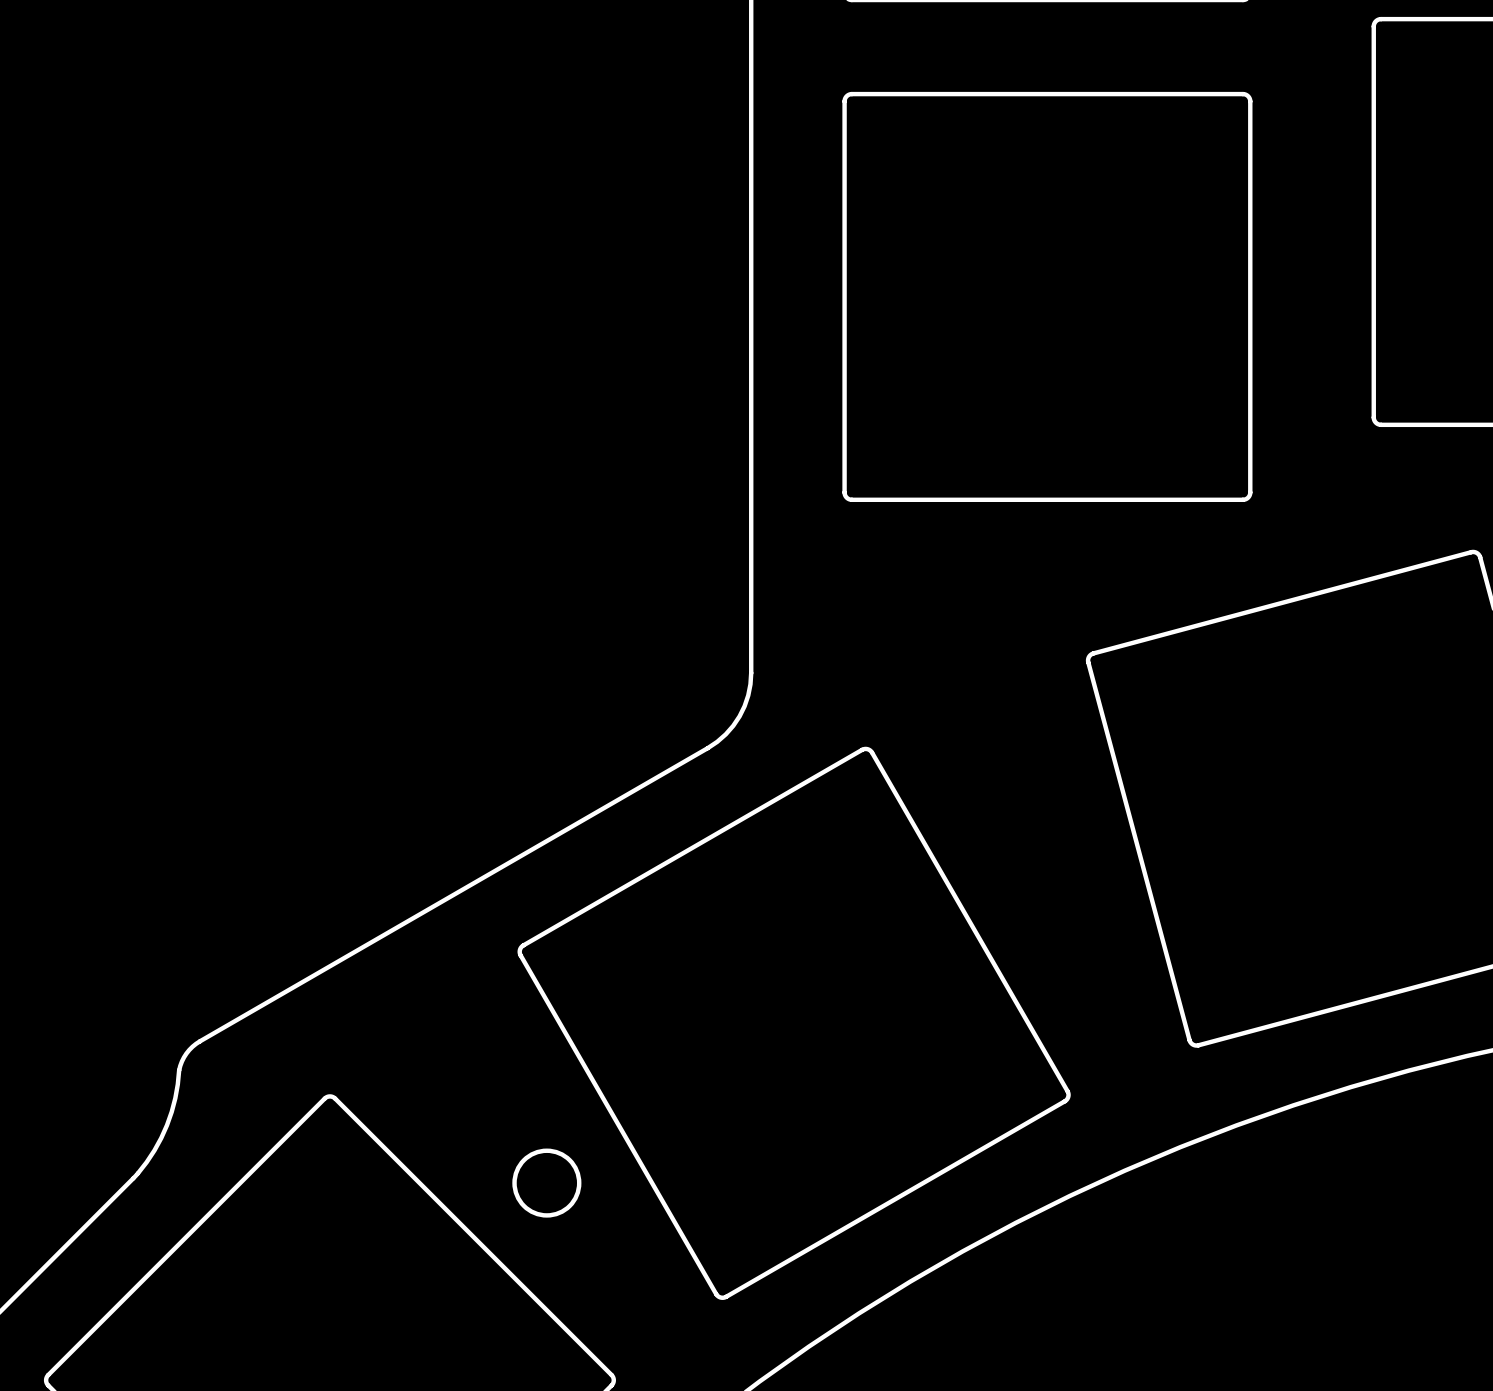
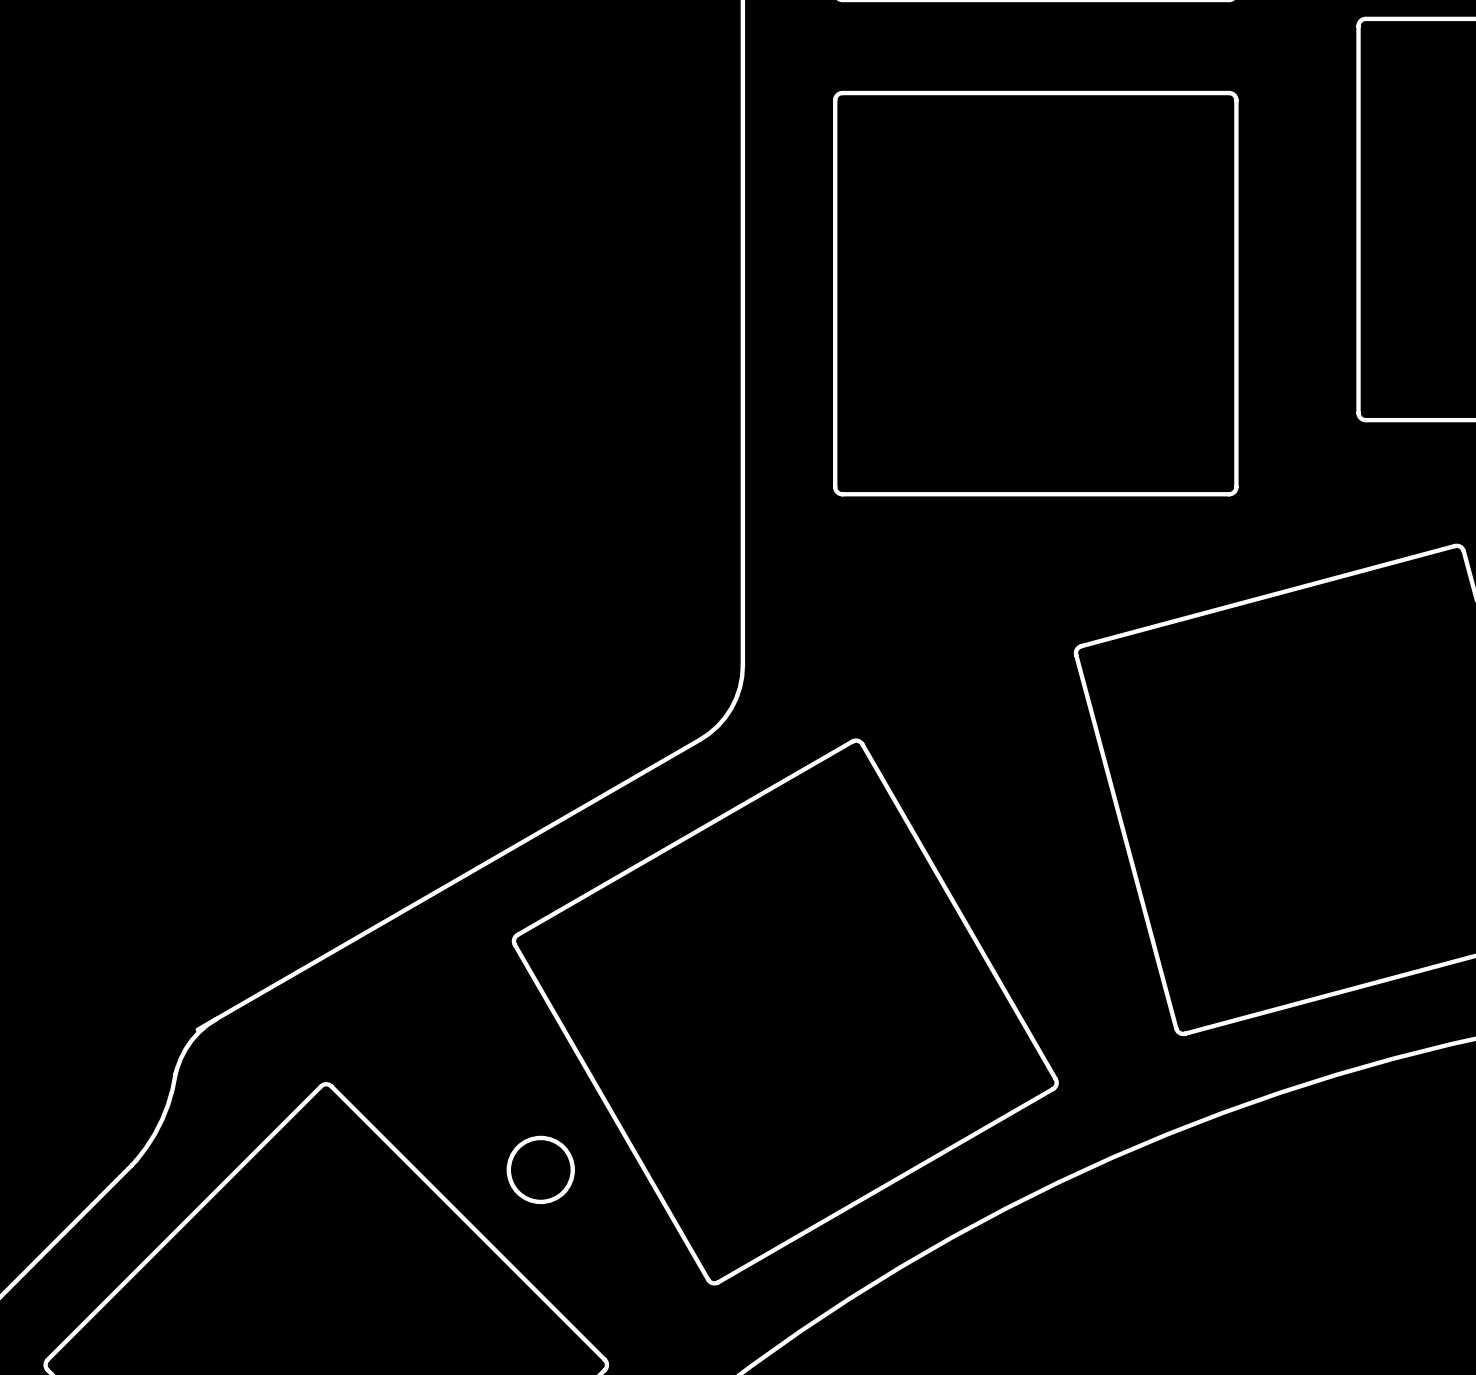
board edge: (199, 1041) (189, 1049) (181, 1061) (175, 1098) (167, 1125) (154, 1150) (137, 1173) -> (216, 1019) (199, 1032) (185, 1049) (176, 1069) (172, 1089) (162, 1119) (154, 1134) (136, 1160)

